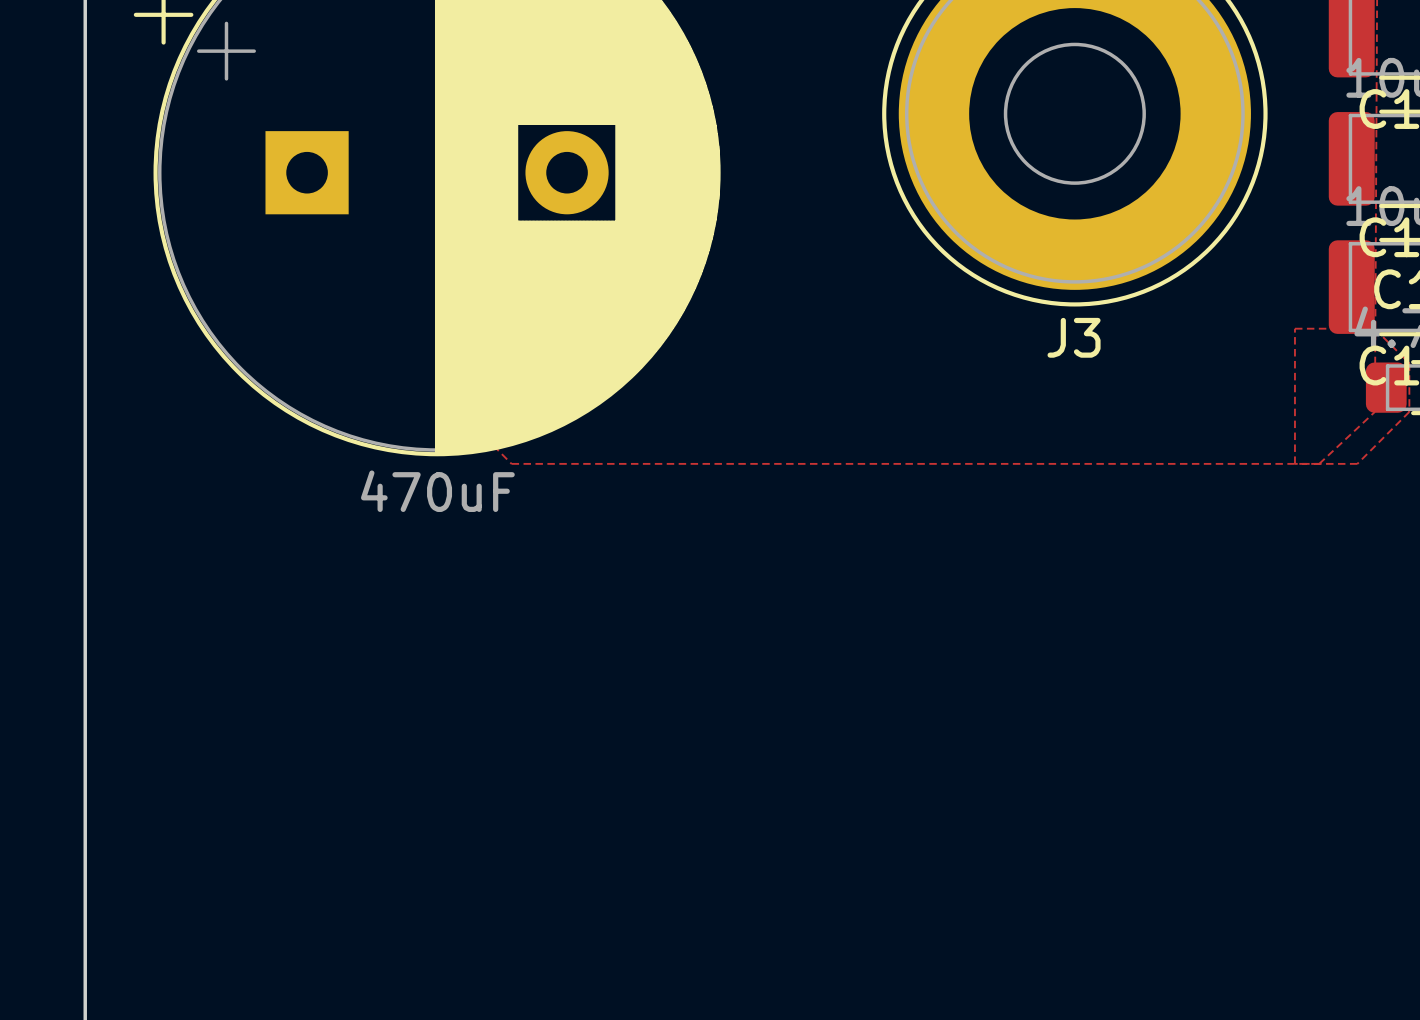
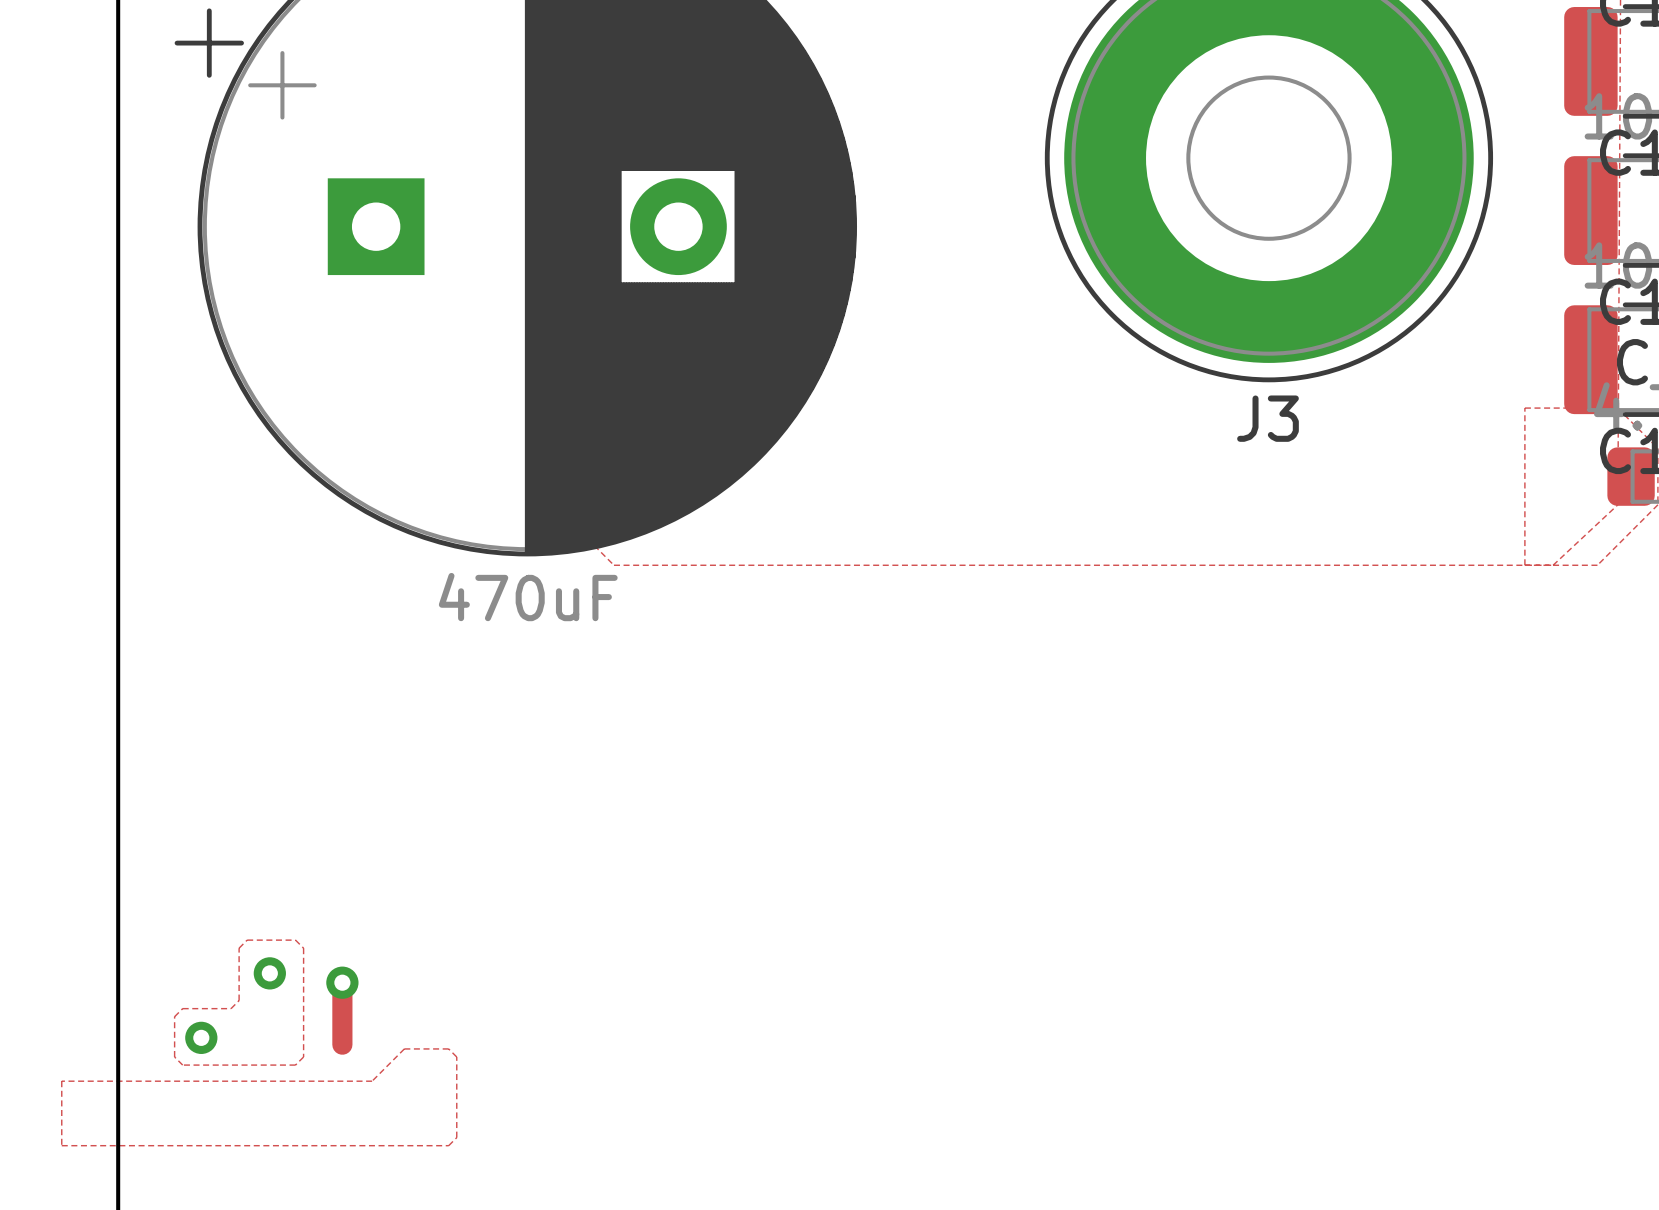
zone outline: none -> (247, 940) (239, 948) (239, 1000) (231, 1008) (182, 1008) (174, 1016) (174, 1057) (182, 1065) (295, 1065) (303, 1057) (303, 948) (295, 940) (247, 940)
via: none -> (269, 973)
track: none -> (342, 982) (342, 1044)
via: none -> (342, 982)
via: none -> (201, 1037)
zone outline: none -> (404, 1048) (448, 1048) (456, 1057) (456, 1137) (448, 1145) (61, 1145) (61, 1081) (372, 1081) (404, 1048)

